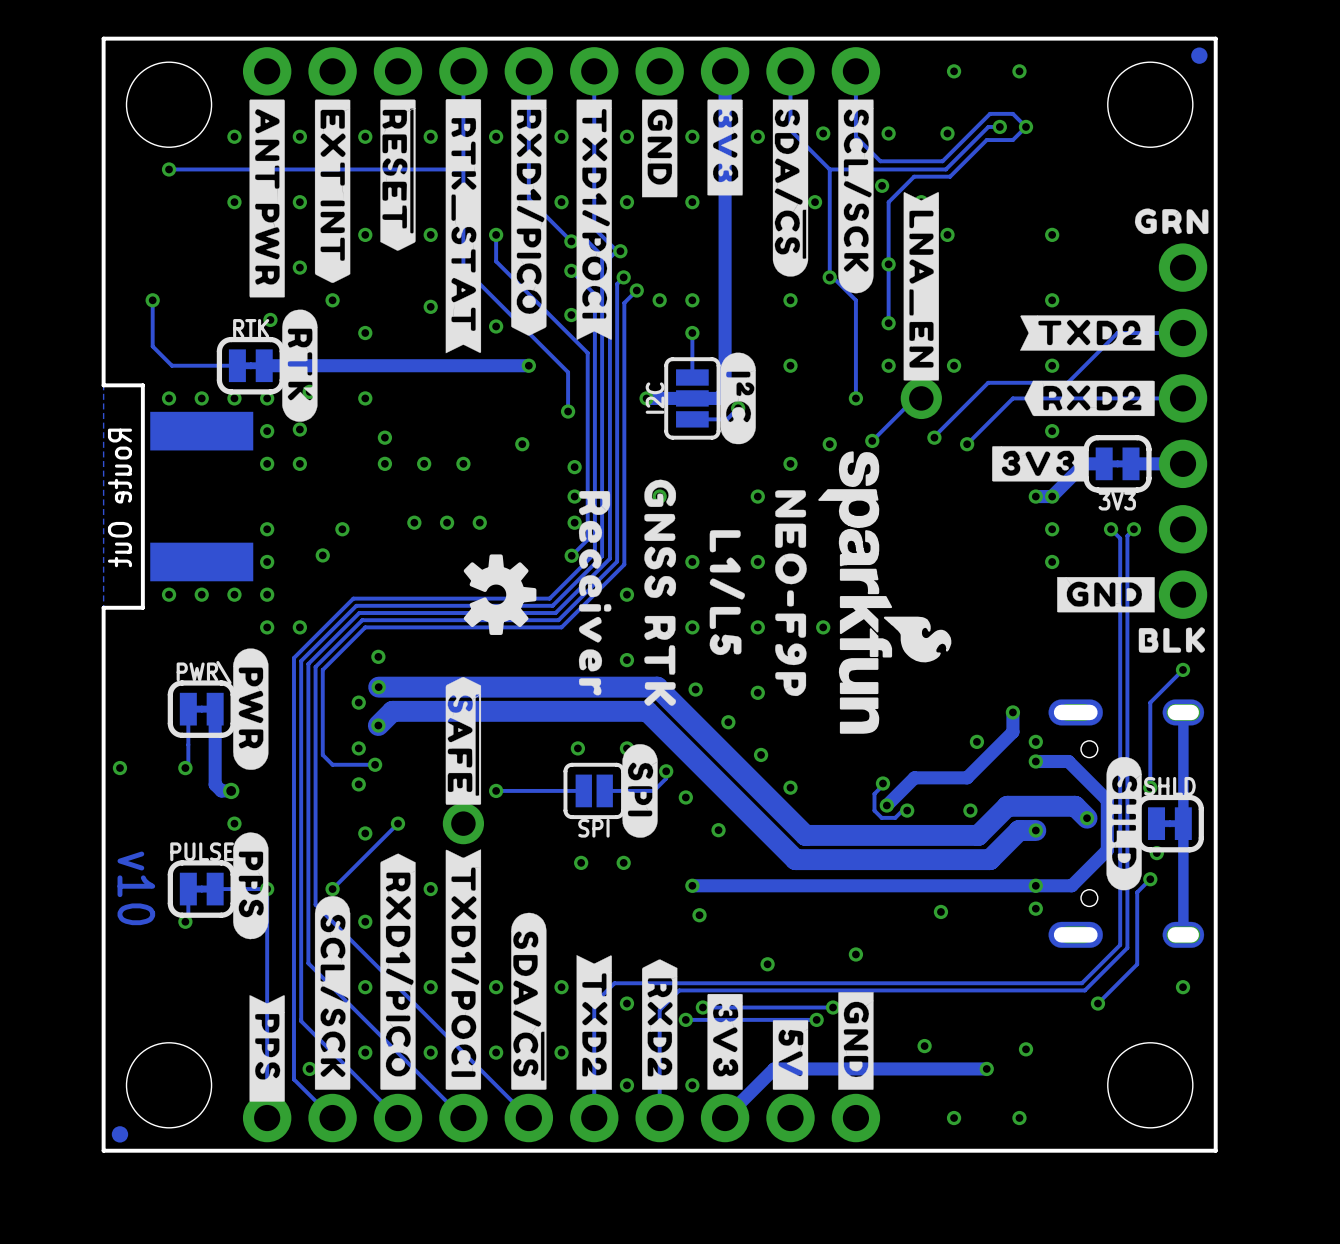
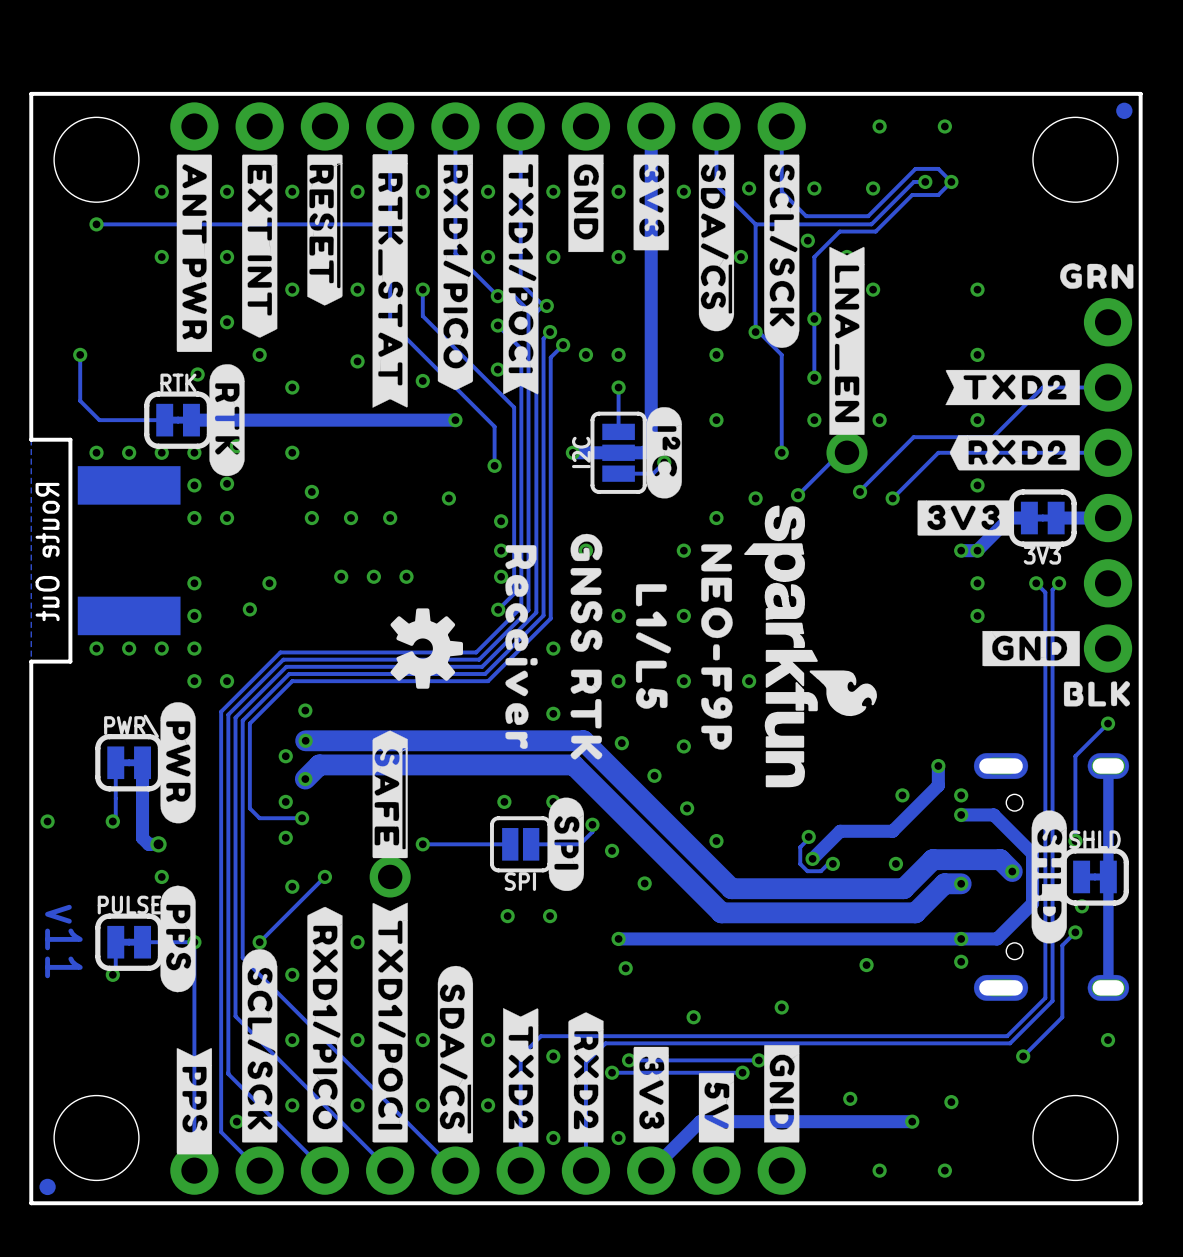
text: v10 (136, 888) -> v11 (63, 941)

